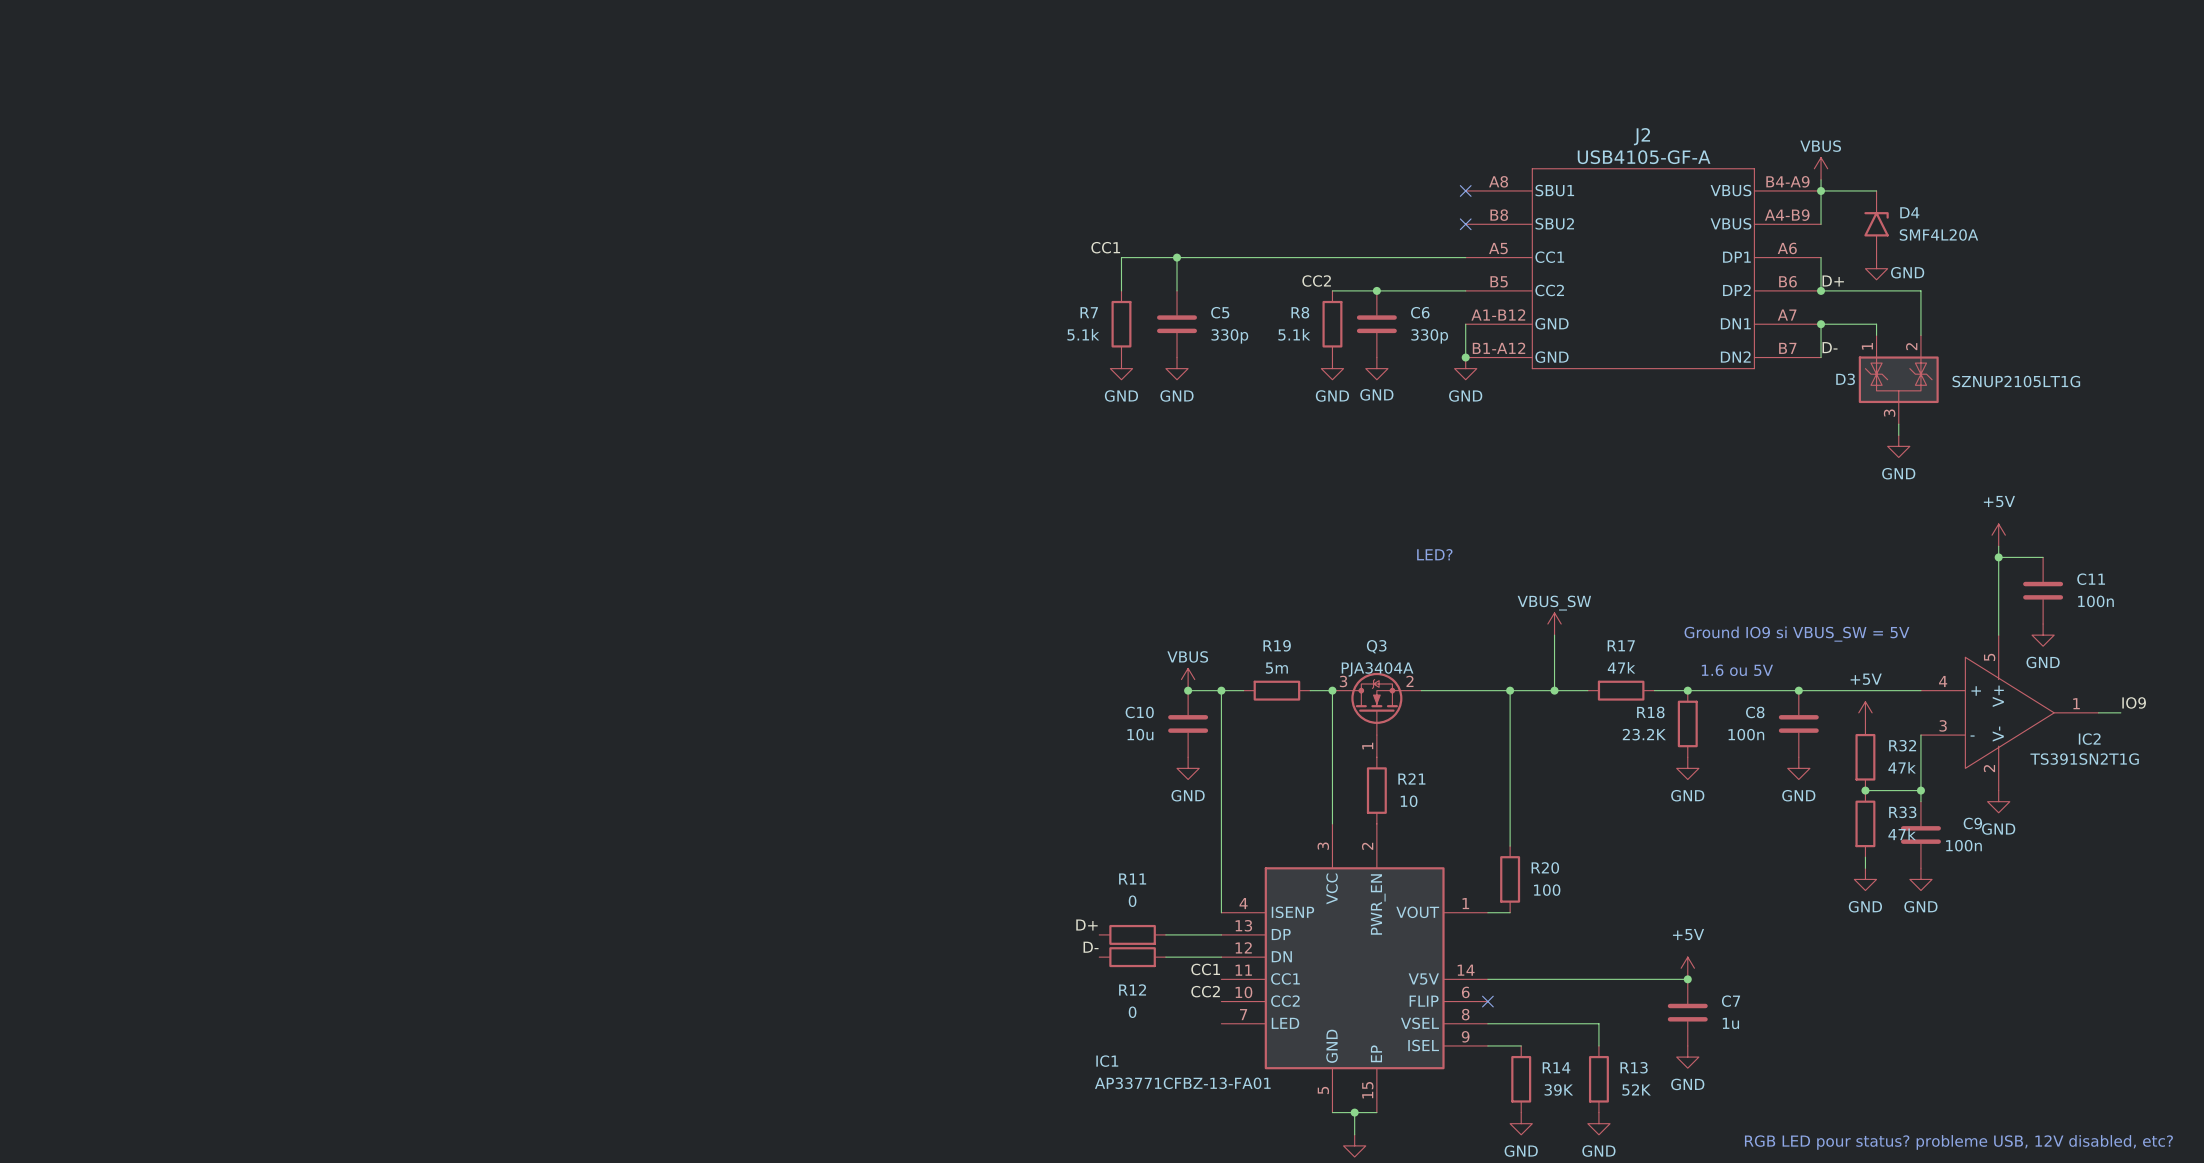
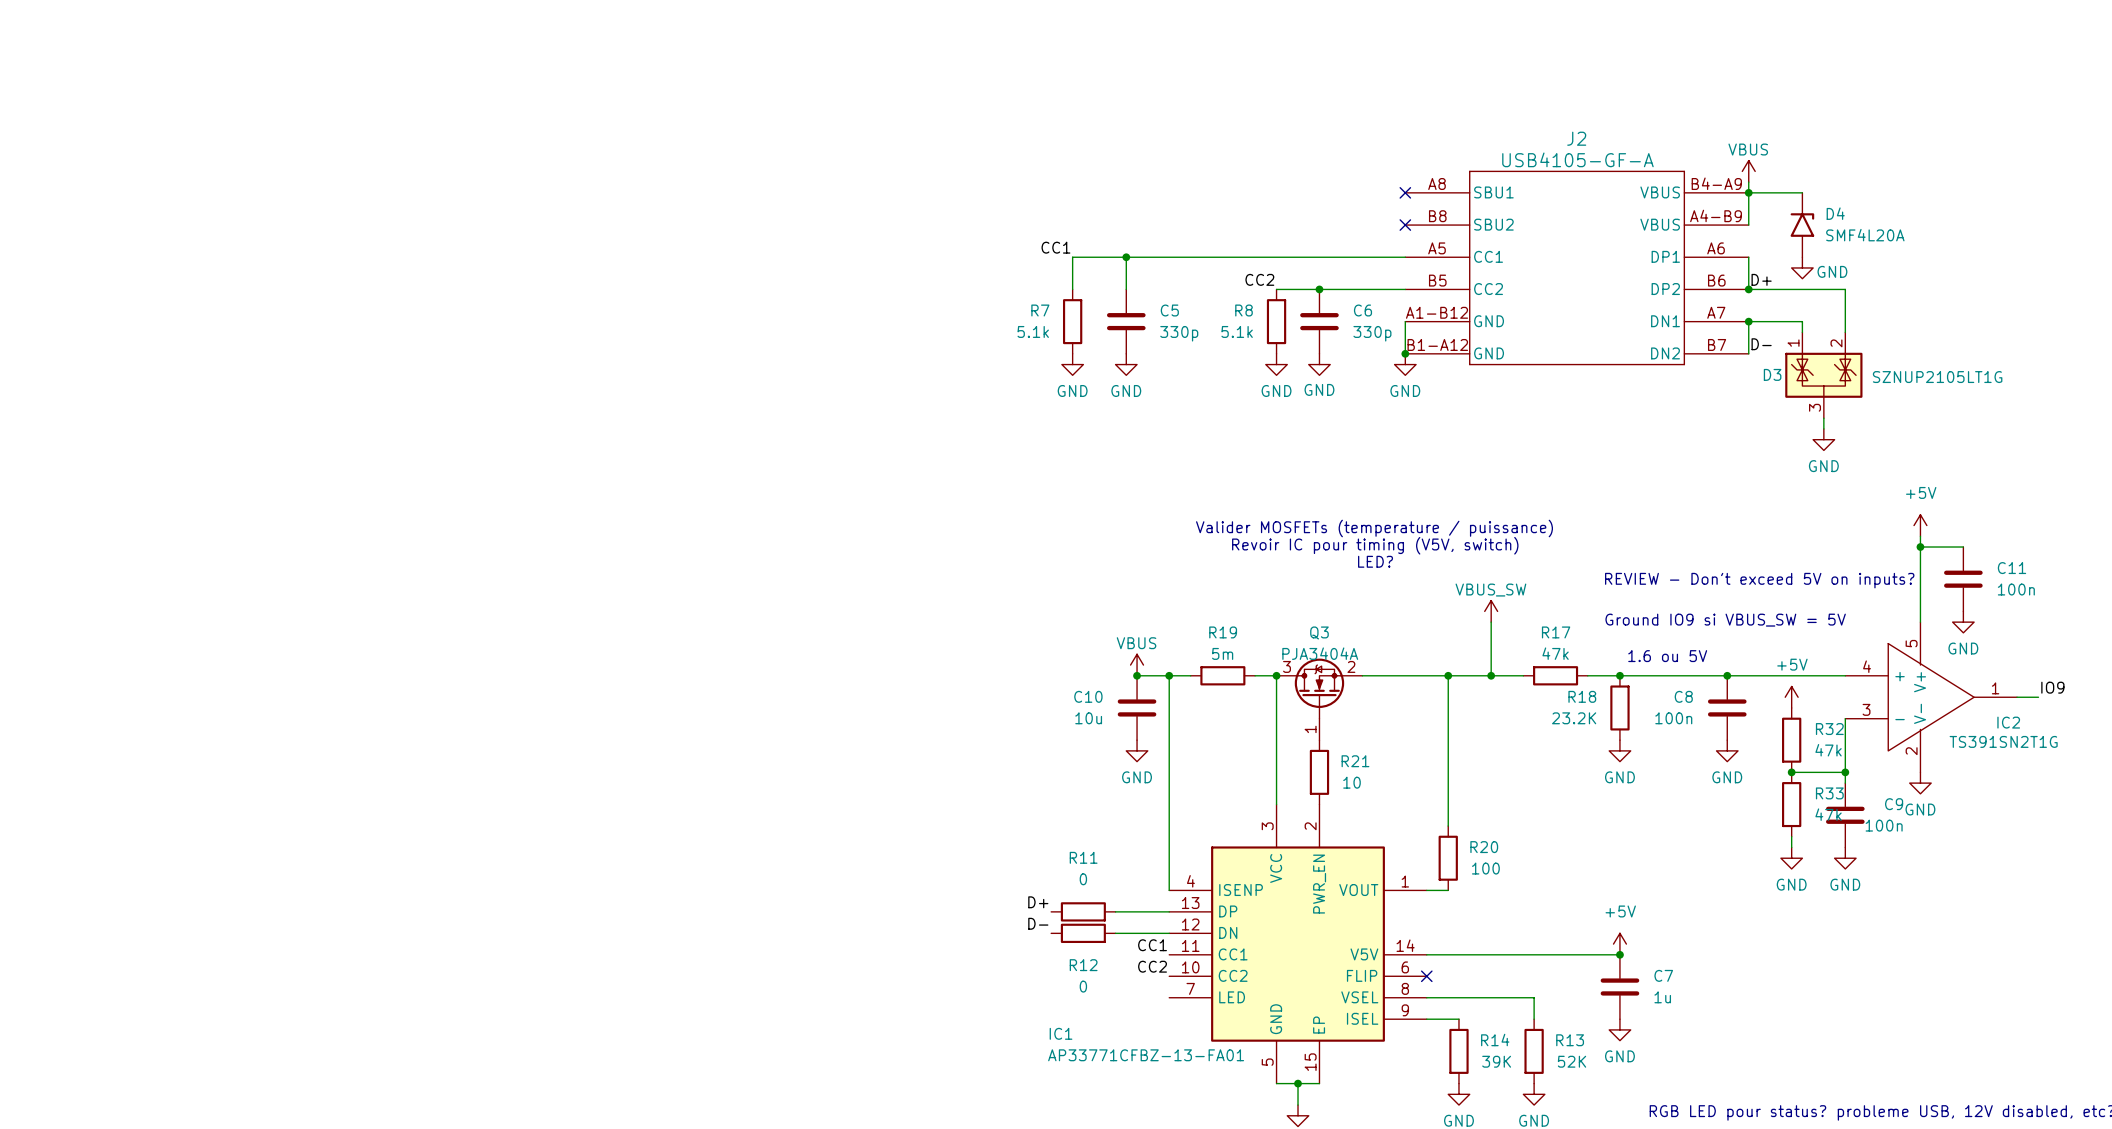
text: none -> Valider MOSFETs (temperature / puissance) (1374, 528)
text: LED? (1434, 554) -> Revoir IC pour timing (V5V, switch) (1375, 545)
text: none -> LED? (1375, 561)
text: none -> REVIEW - Don't exceed 5V on inputs? (1759, 580)

